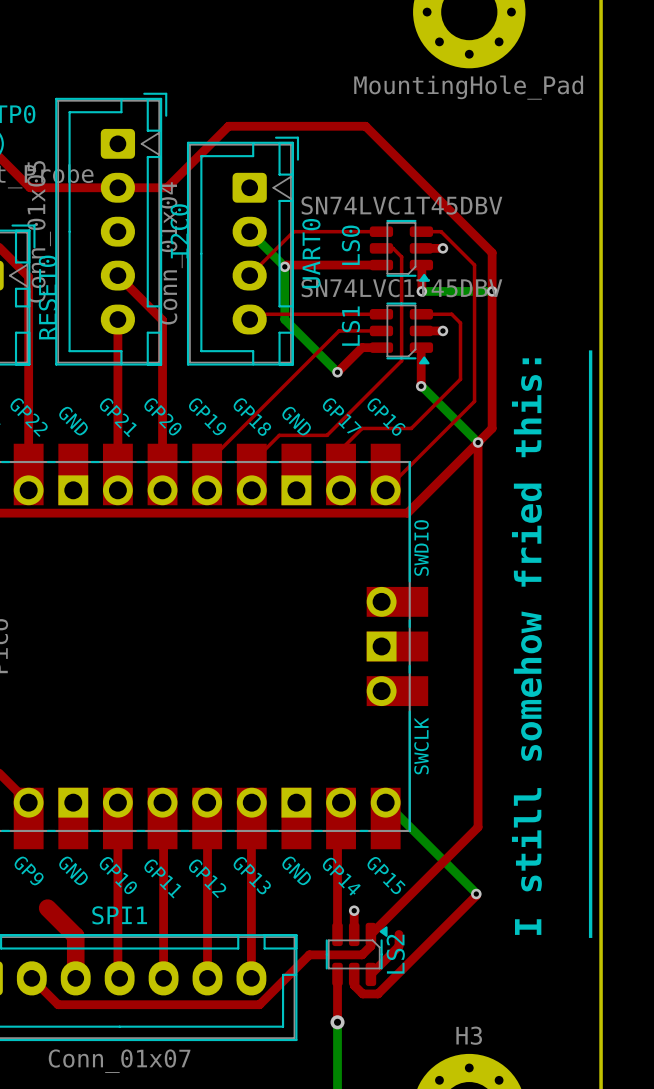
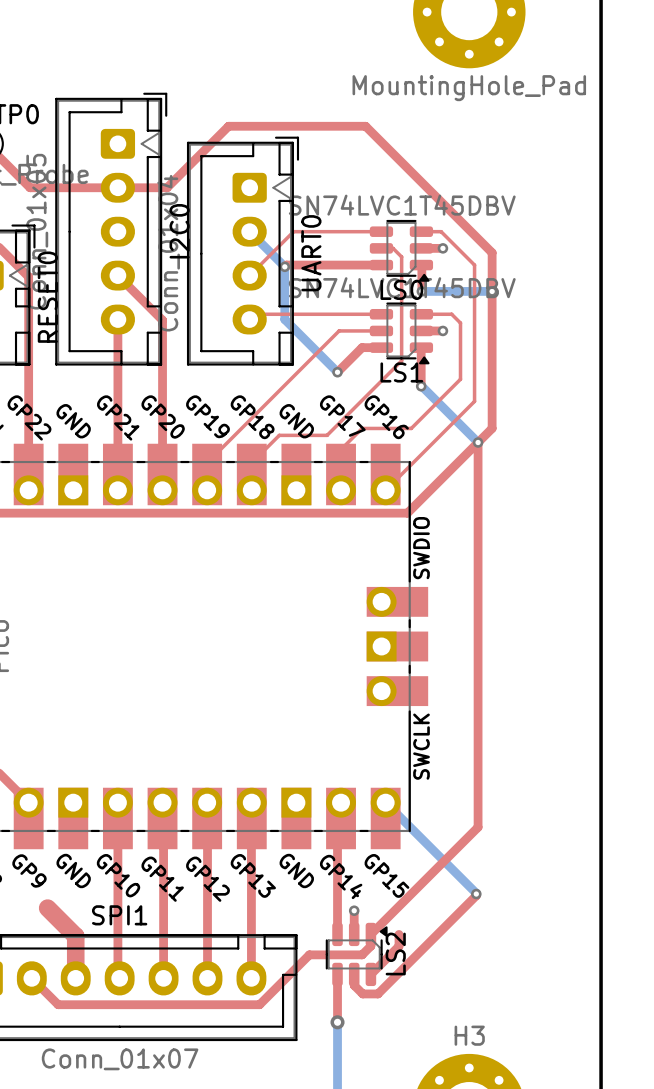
LS0 name rotation: 0° (350, 245) -> 90° clockwise (401, 289)
LS0 name position: LS0 (350, 245) -> LS0 (401, 289)
LS1 name rotation: 0° (350, 326) -> 90° clockwise (401, 372)
LS1 name position: LS1 (350, 326) -> LS1 (401, 372)
text: ___________________________ (590, 644) -> none
text: I still somehow fried this: (526, 646) -> none

